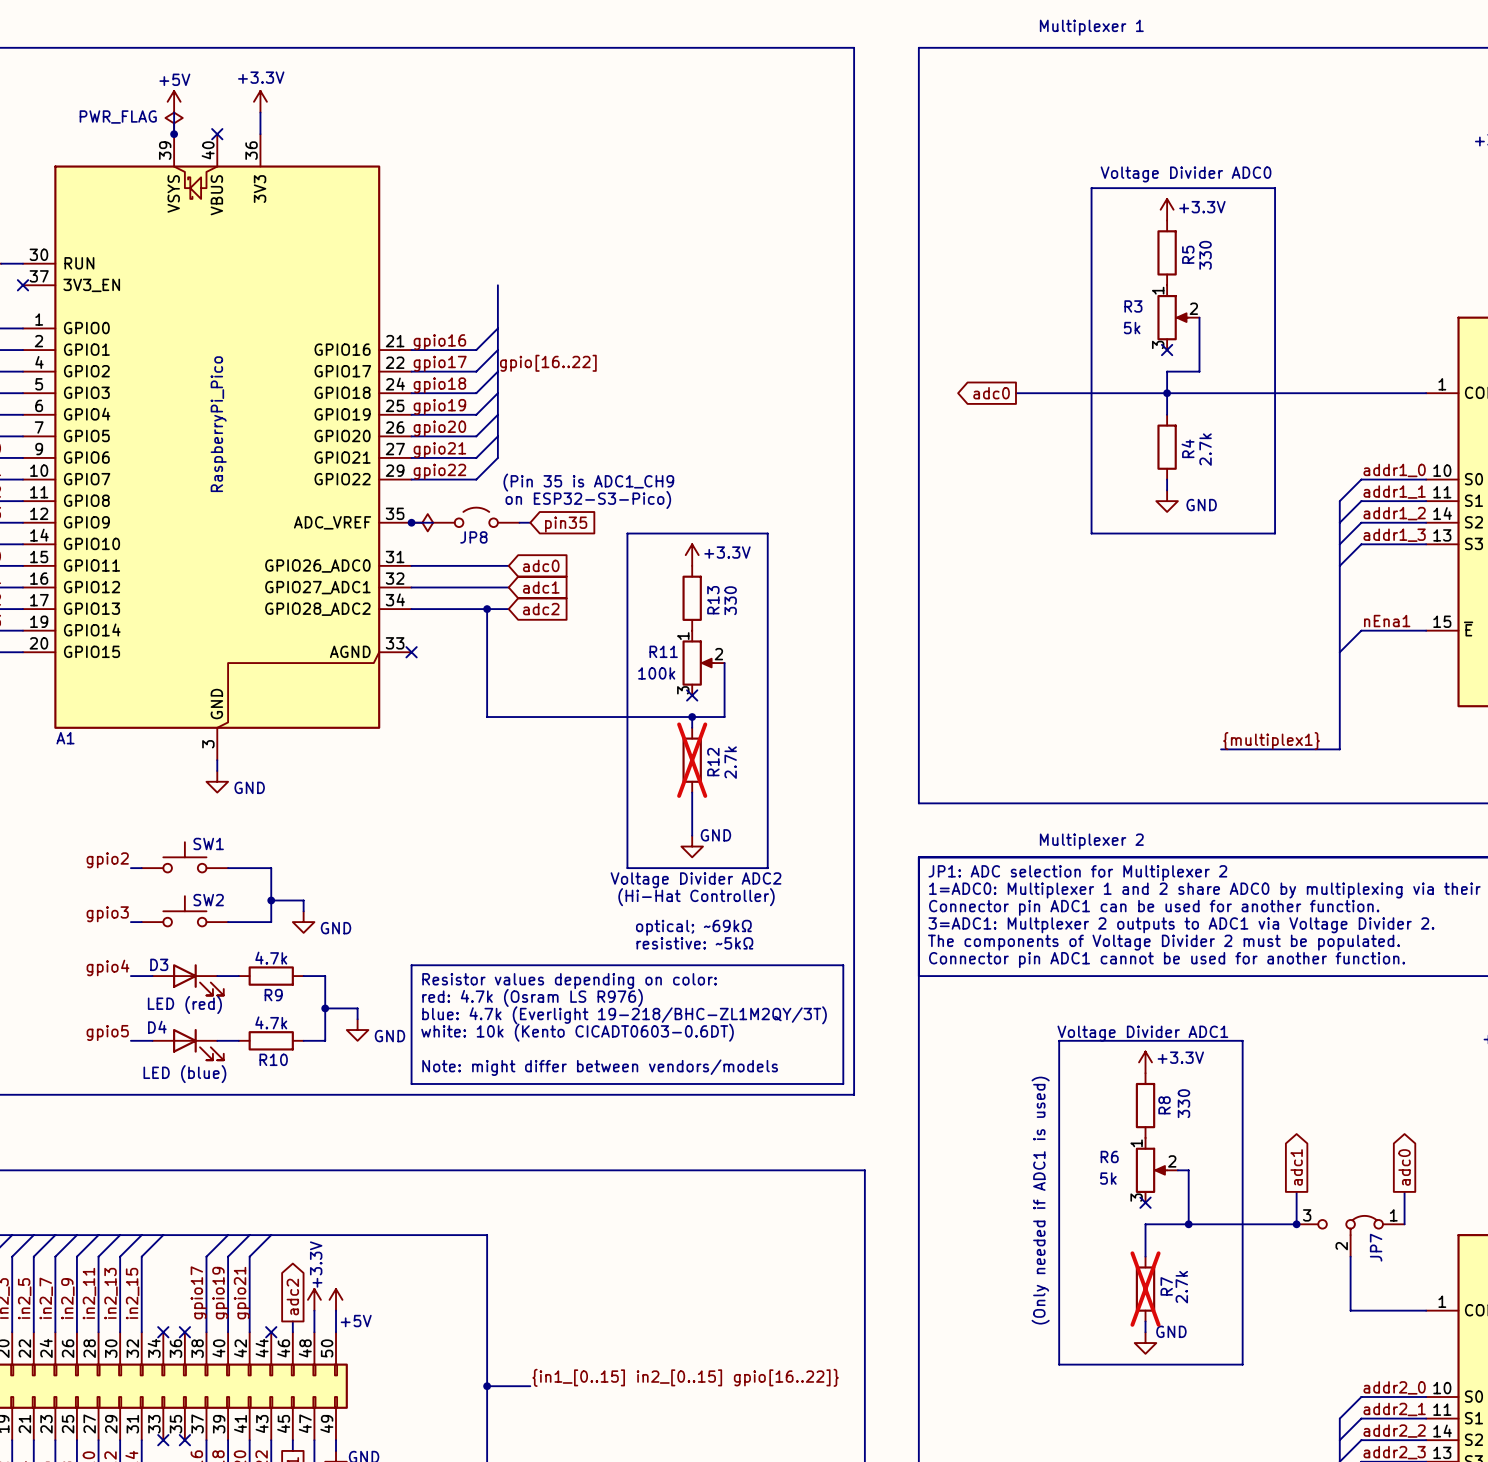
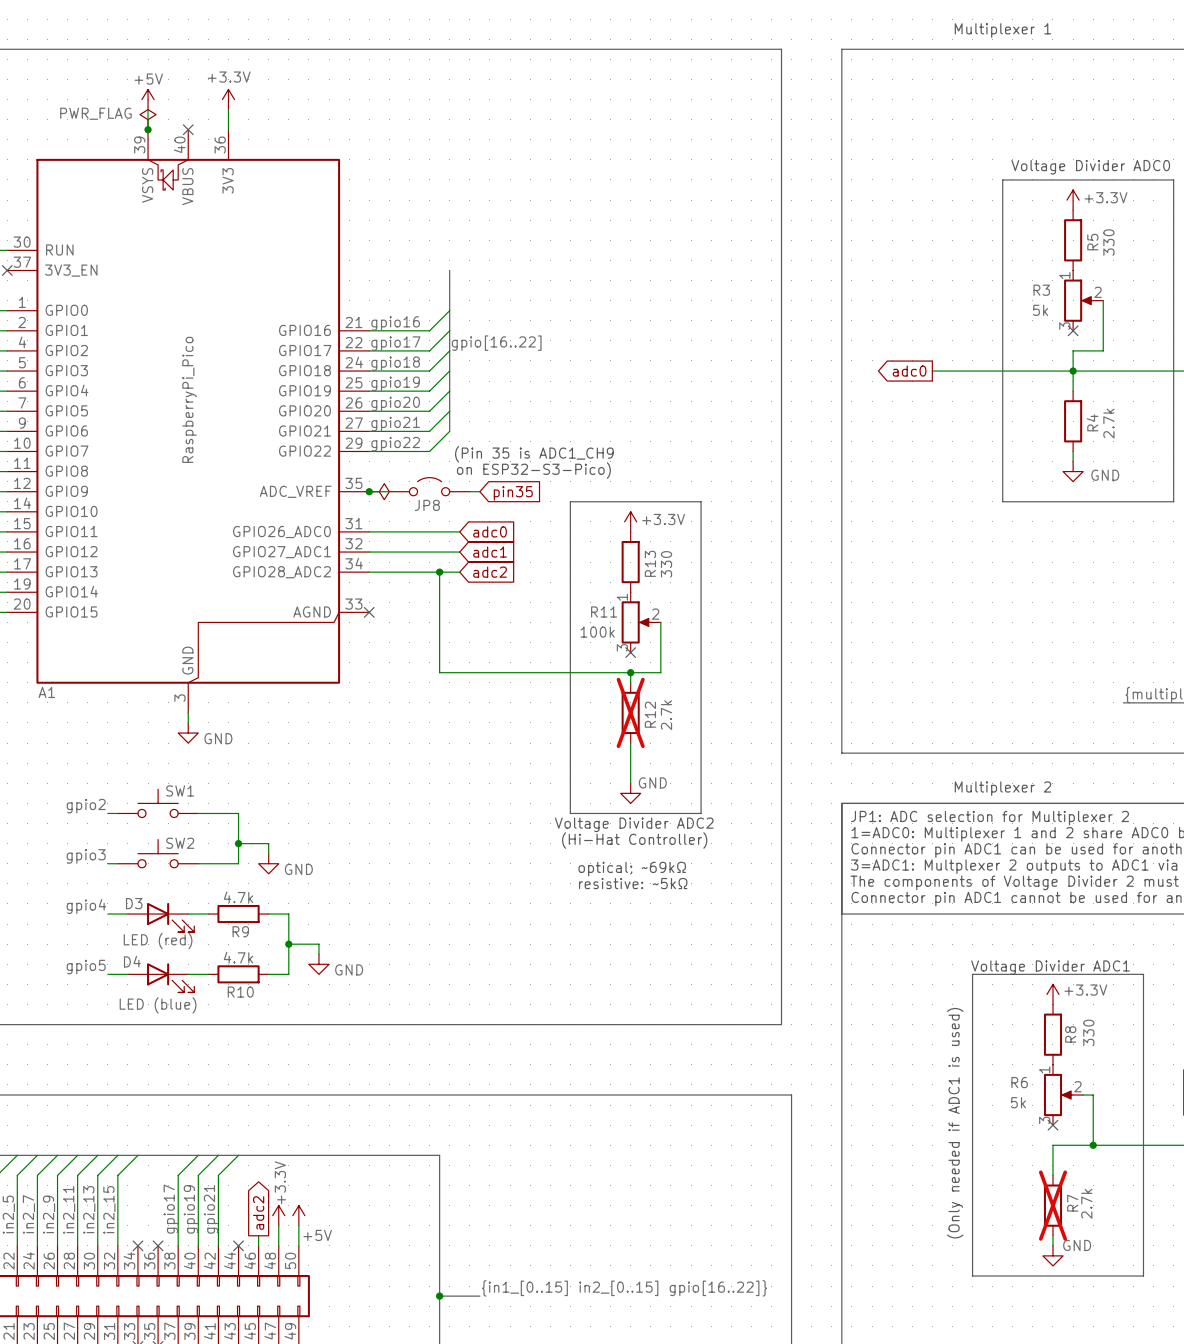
line: (411, 965) (843, 965) (843, 1083) (411, 1083) (411, 965) -> none
text: Resistor values depending on color: (569, 981) -> none
text: red: 4.7k (Osram LS R976) (532, 997) -> none
text: blue: 4.7k (Everlight 19-218/BHC-ZL1M2QY/3T) (624, 1015) -> none
text: white: 10k (Kento CICADT0603-0.6DT) (577, 1032) -> none
text: Note: might differ between vendors/models (600, 1067) -> none

